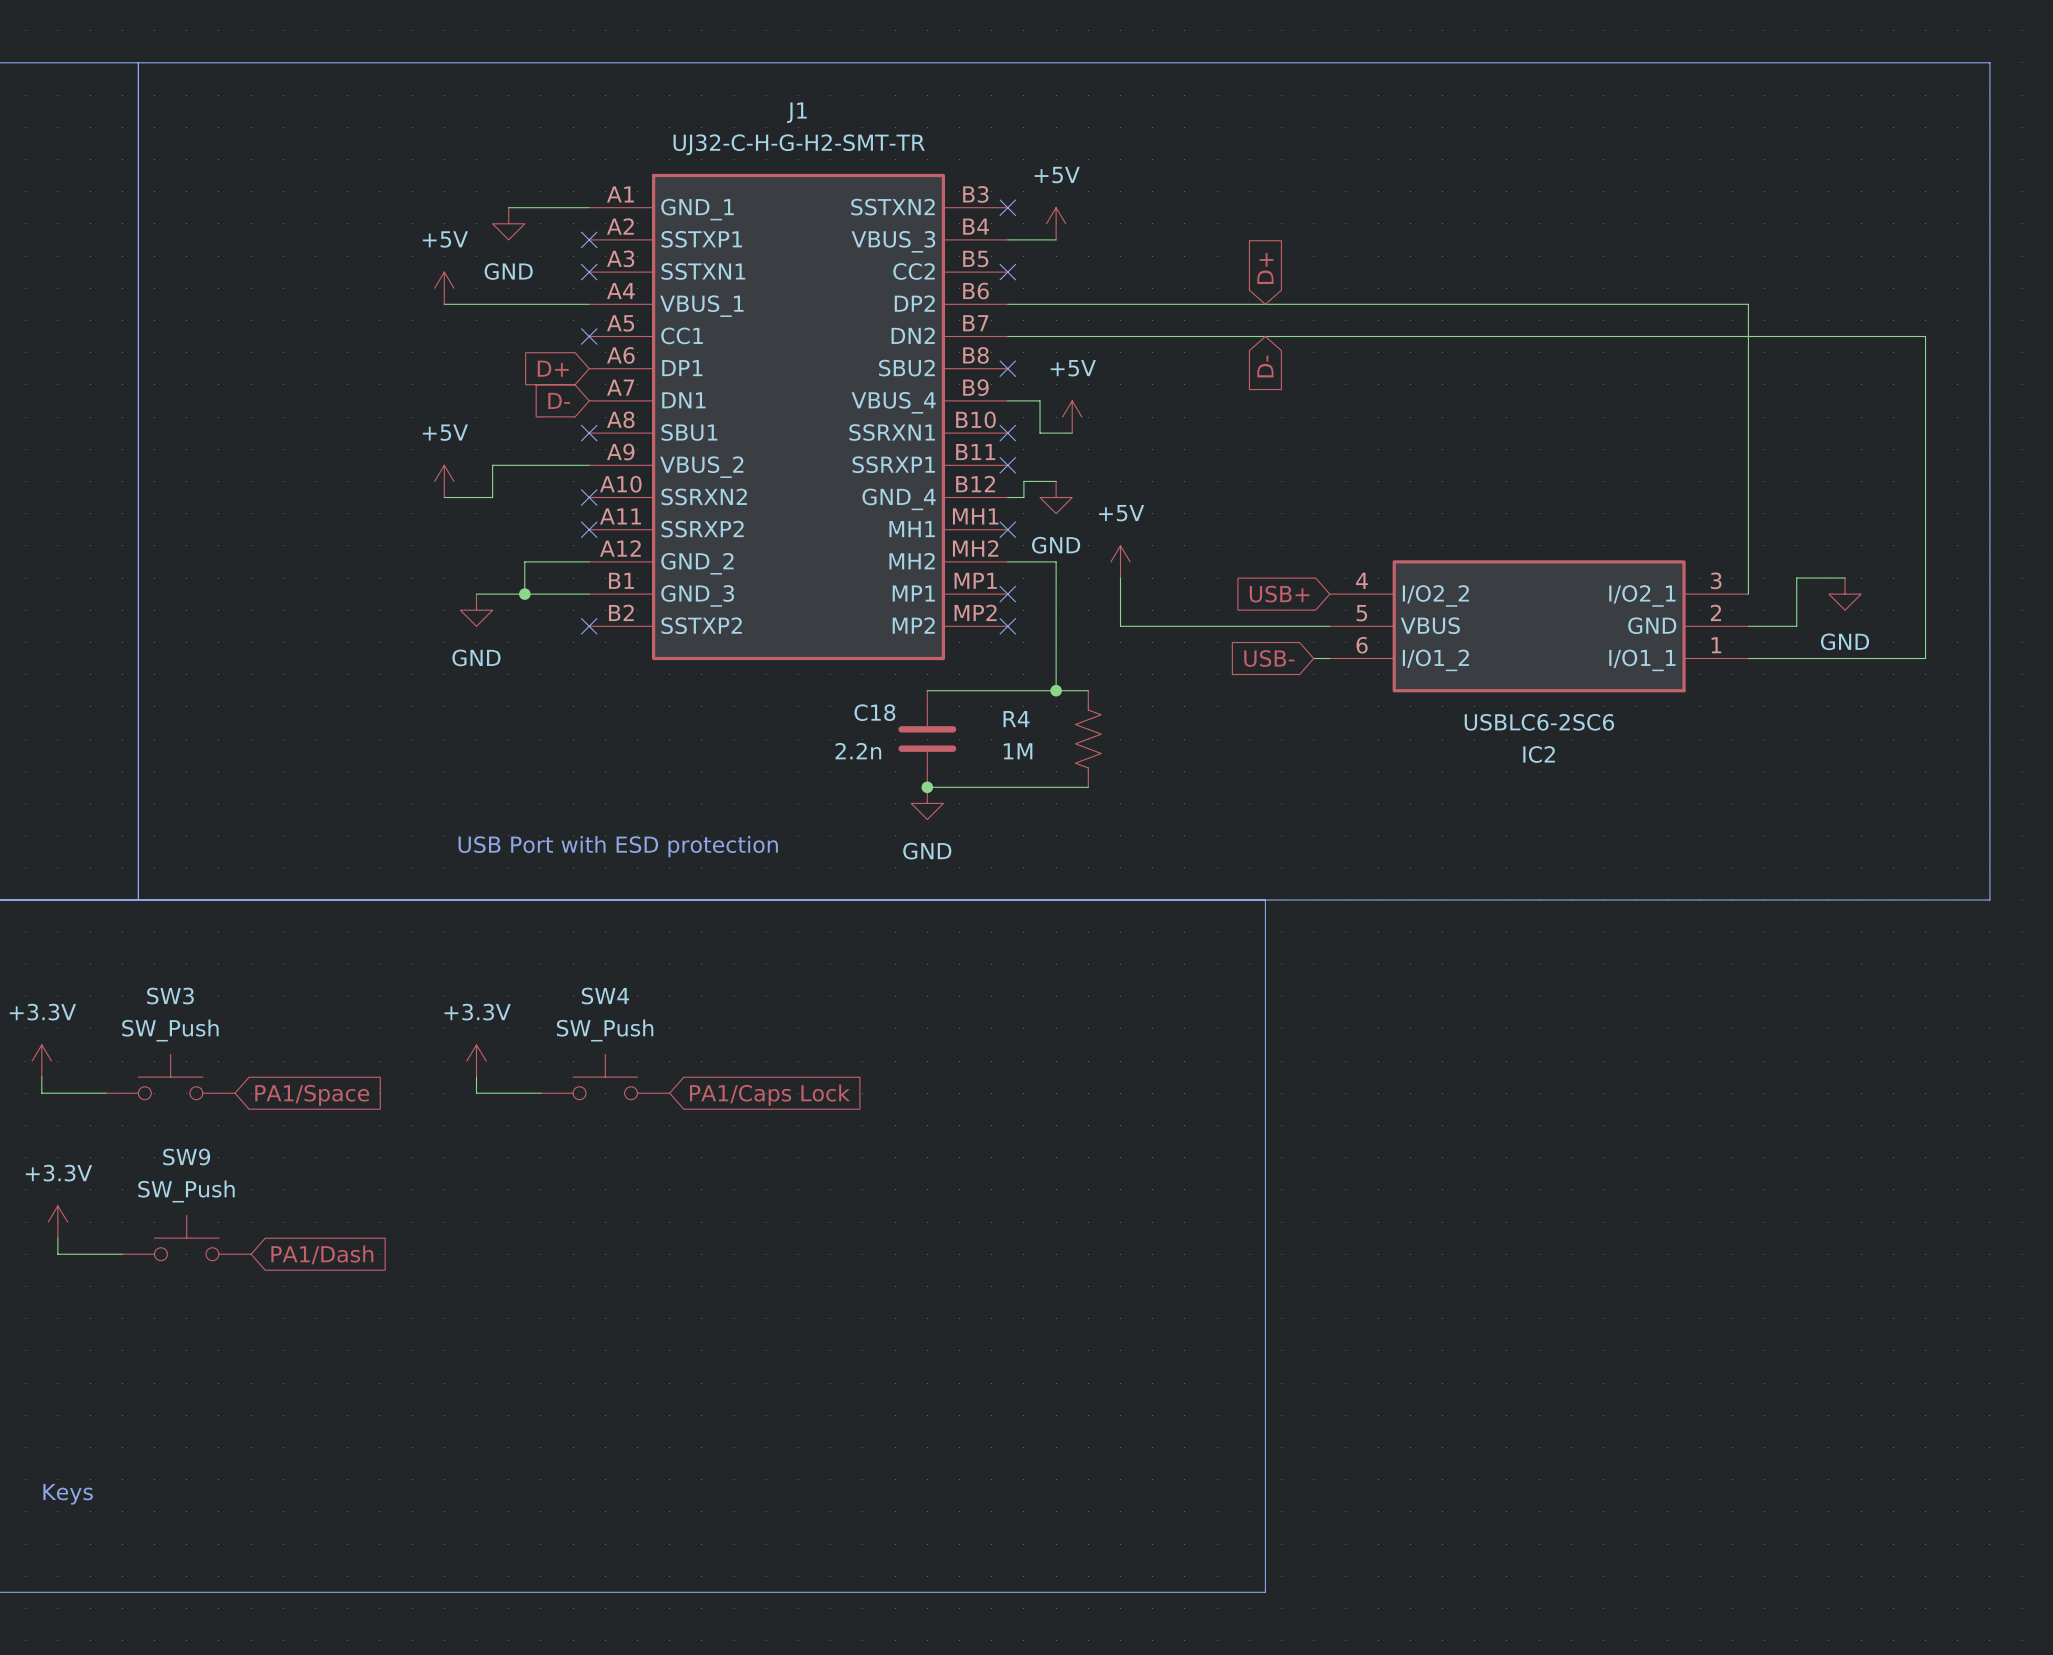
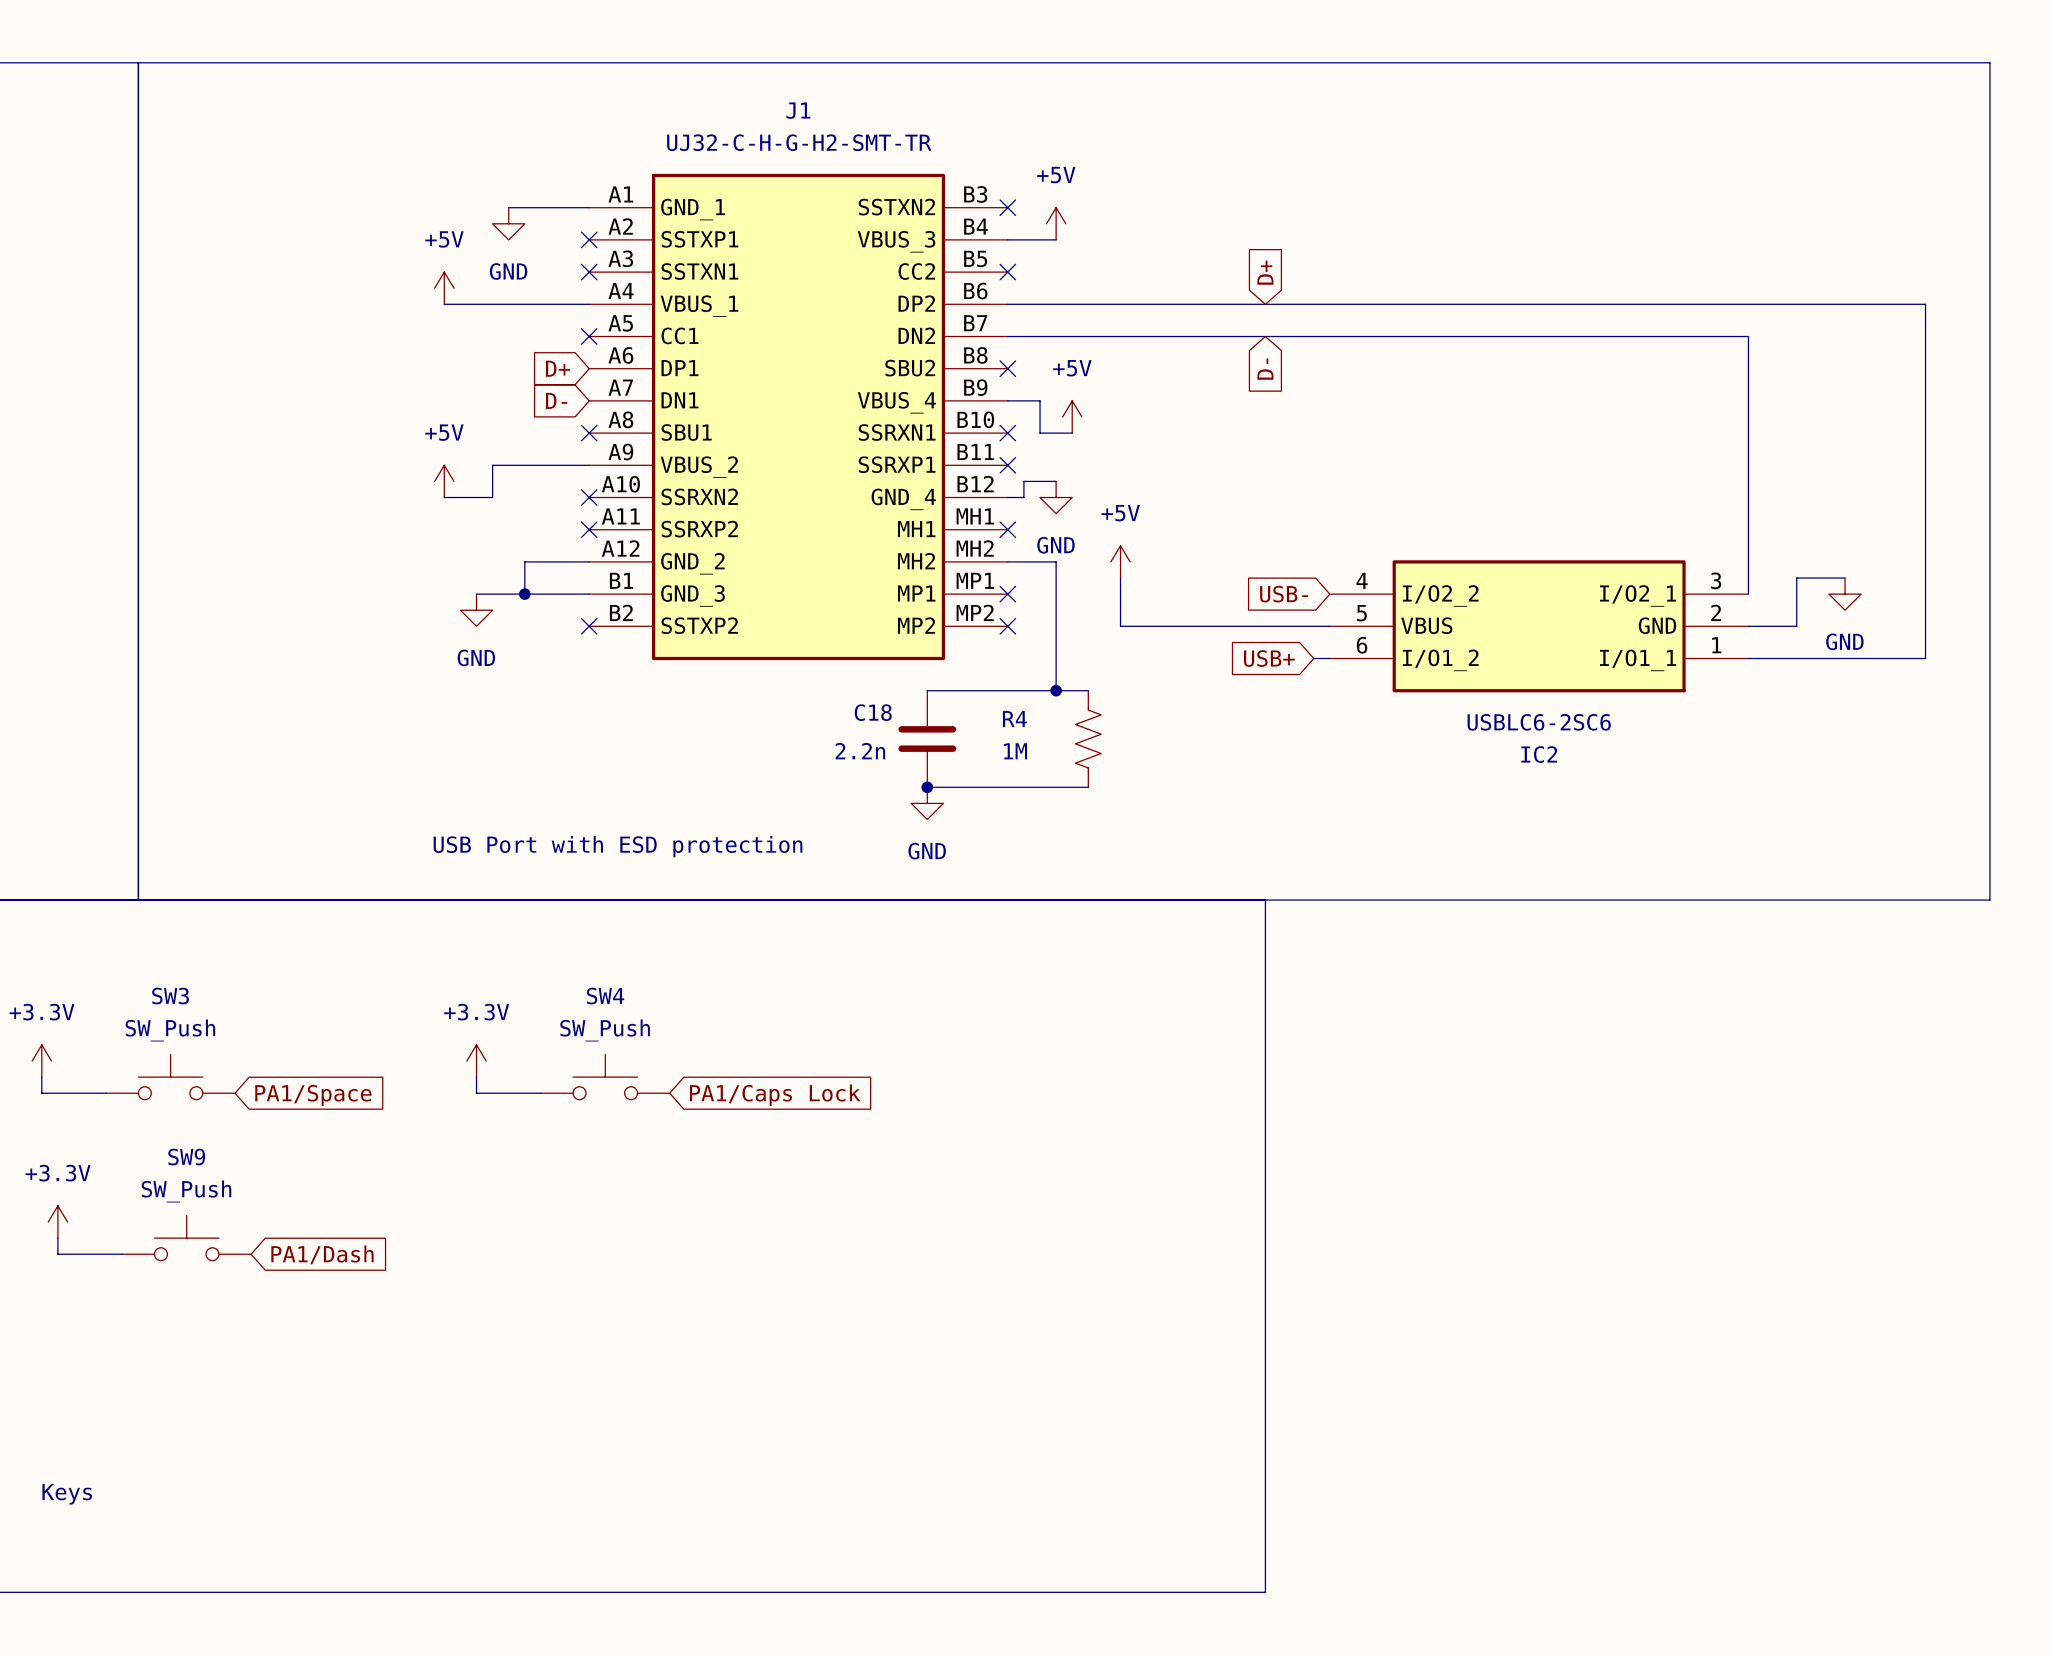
wire: (1748, 304) (1748, 336) (1925, 336) -> (1748, 304) (1925, 304) (1925, 336)
global label: USB+ (1279, 594) -> USB- (1283, 594)
global label: USB- (1269, 658) -> USB+ (1269, 658)

